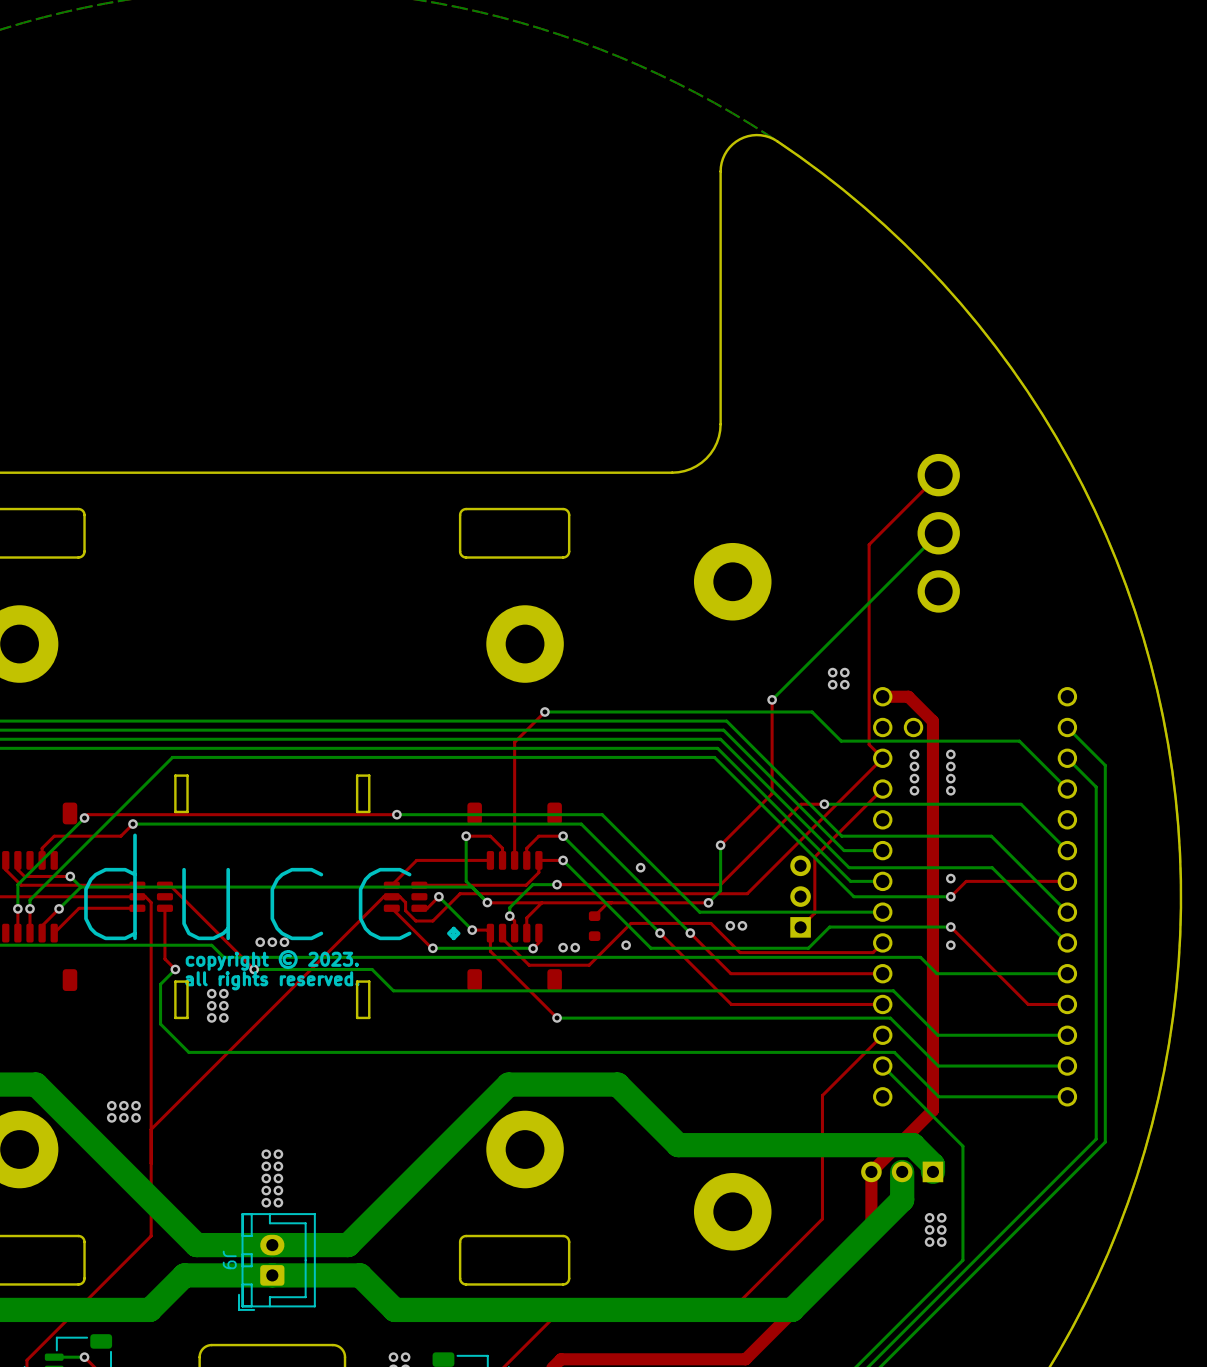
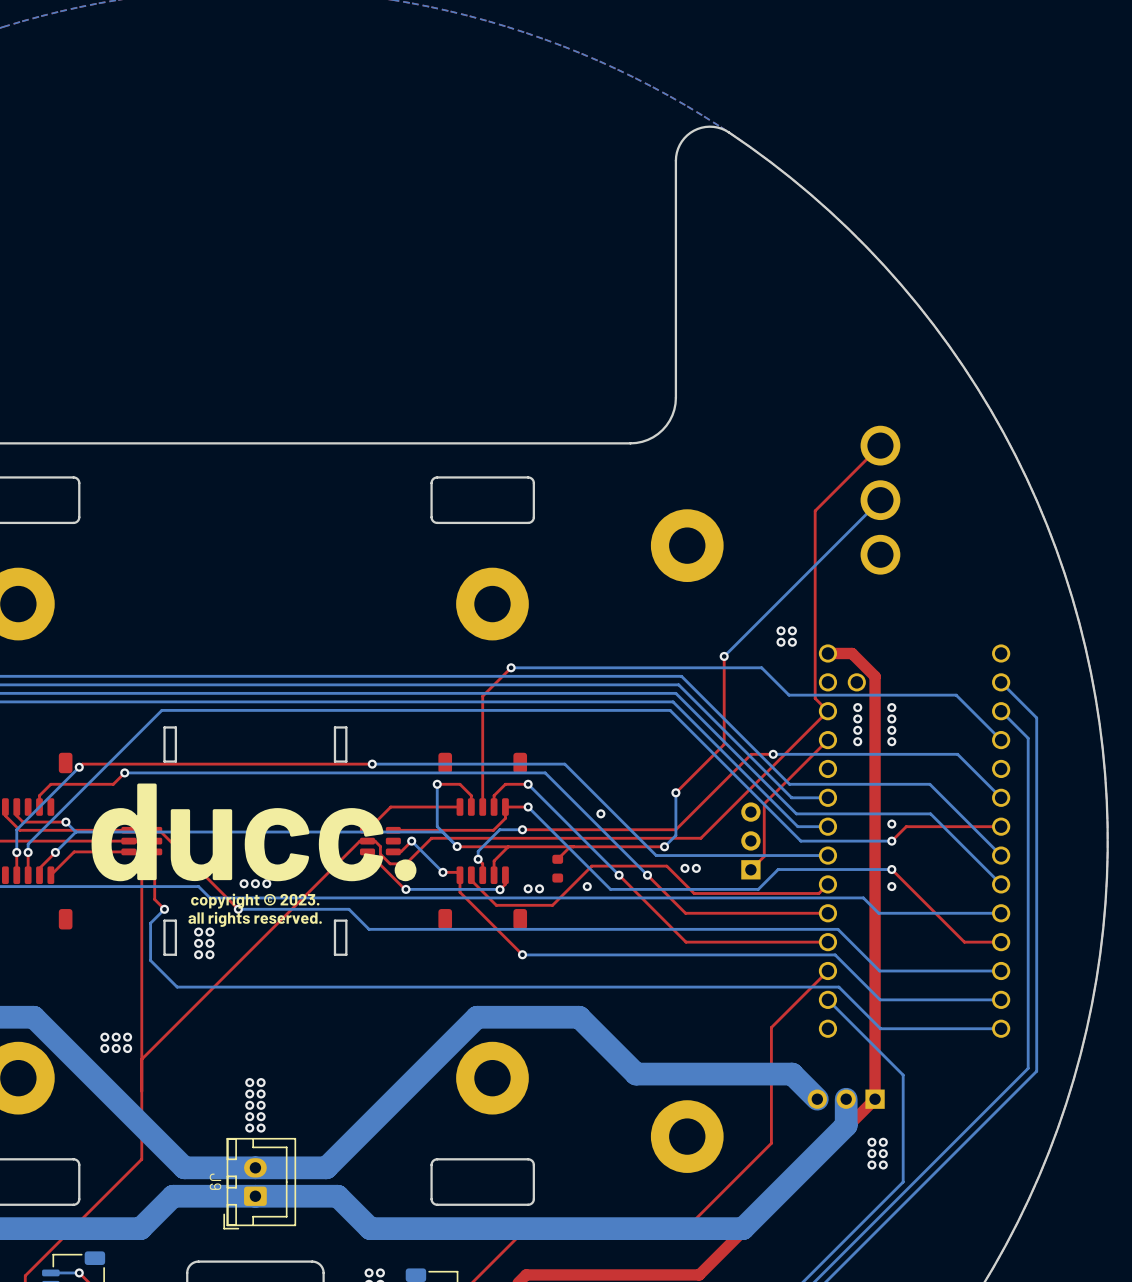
top track: (932, 1110) (871, 1171) (871, 1233) -> (875, 1041) (875, 1099) (817, 1156)
bottom track: (844, 1145) (913, 1145) (932, 1165) (932, 1171) -> (792, 1074) (817, 1099)

